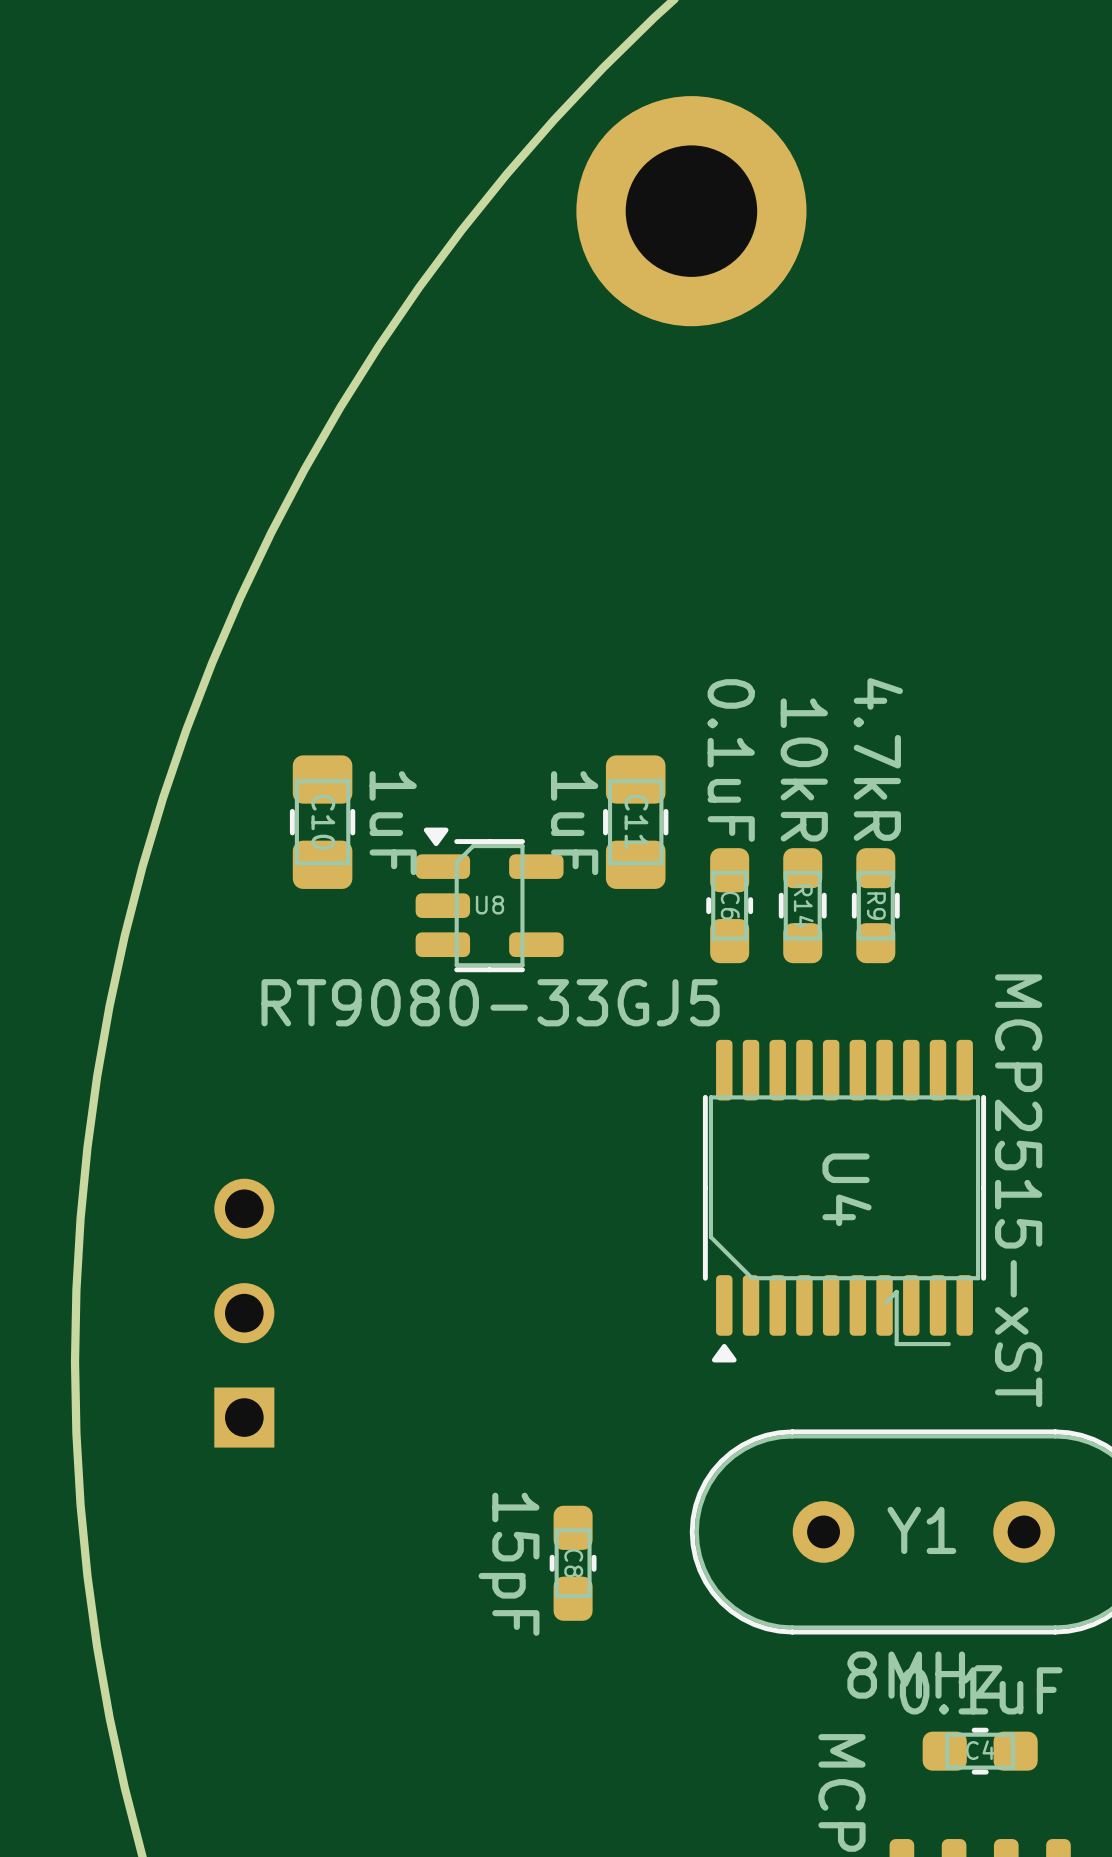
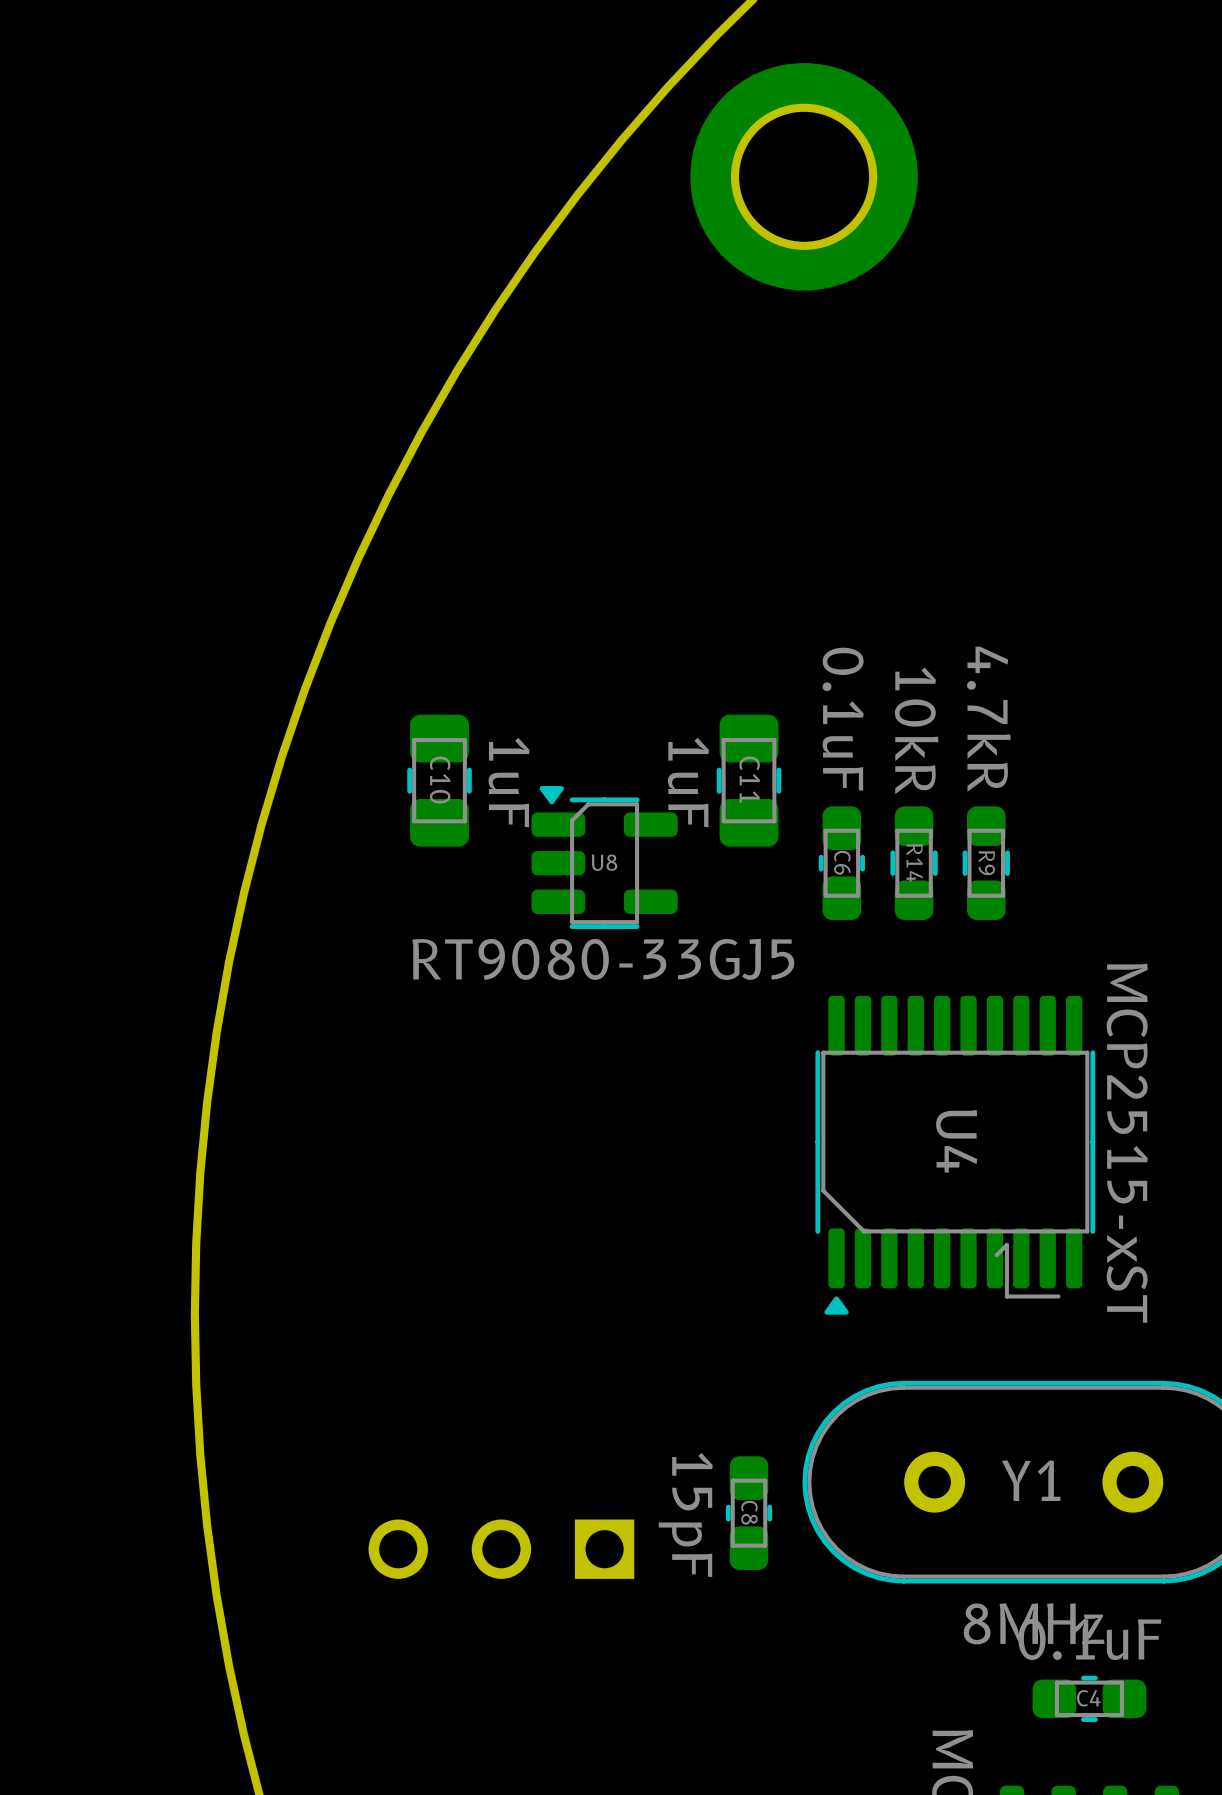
part rotation: 0° (244, 1313) -> 90° counterclockwise (501, 1549)
part position: (244, 1313) -> (501, 1549)
C8 position: (573, 1563) -> (749, 1513)

